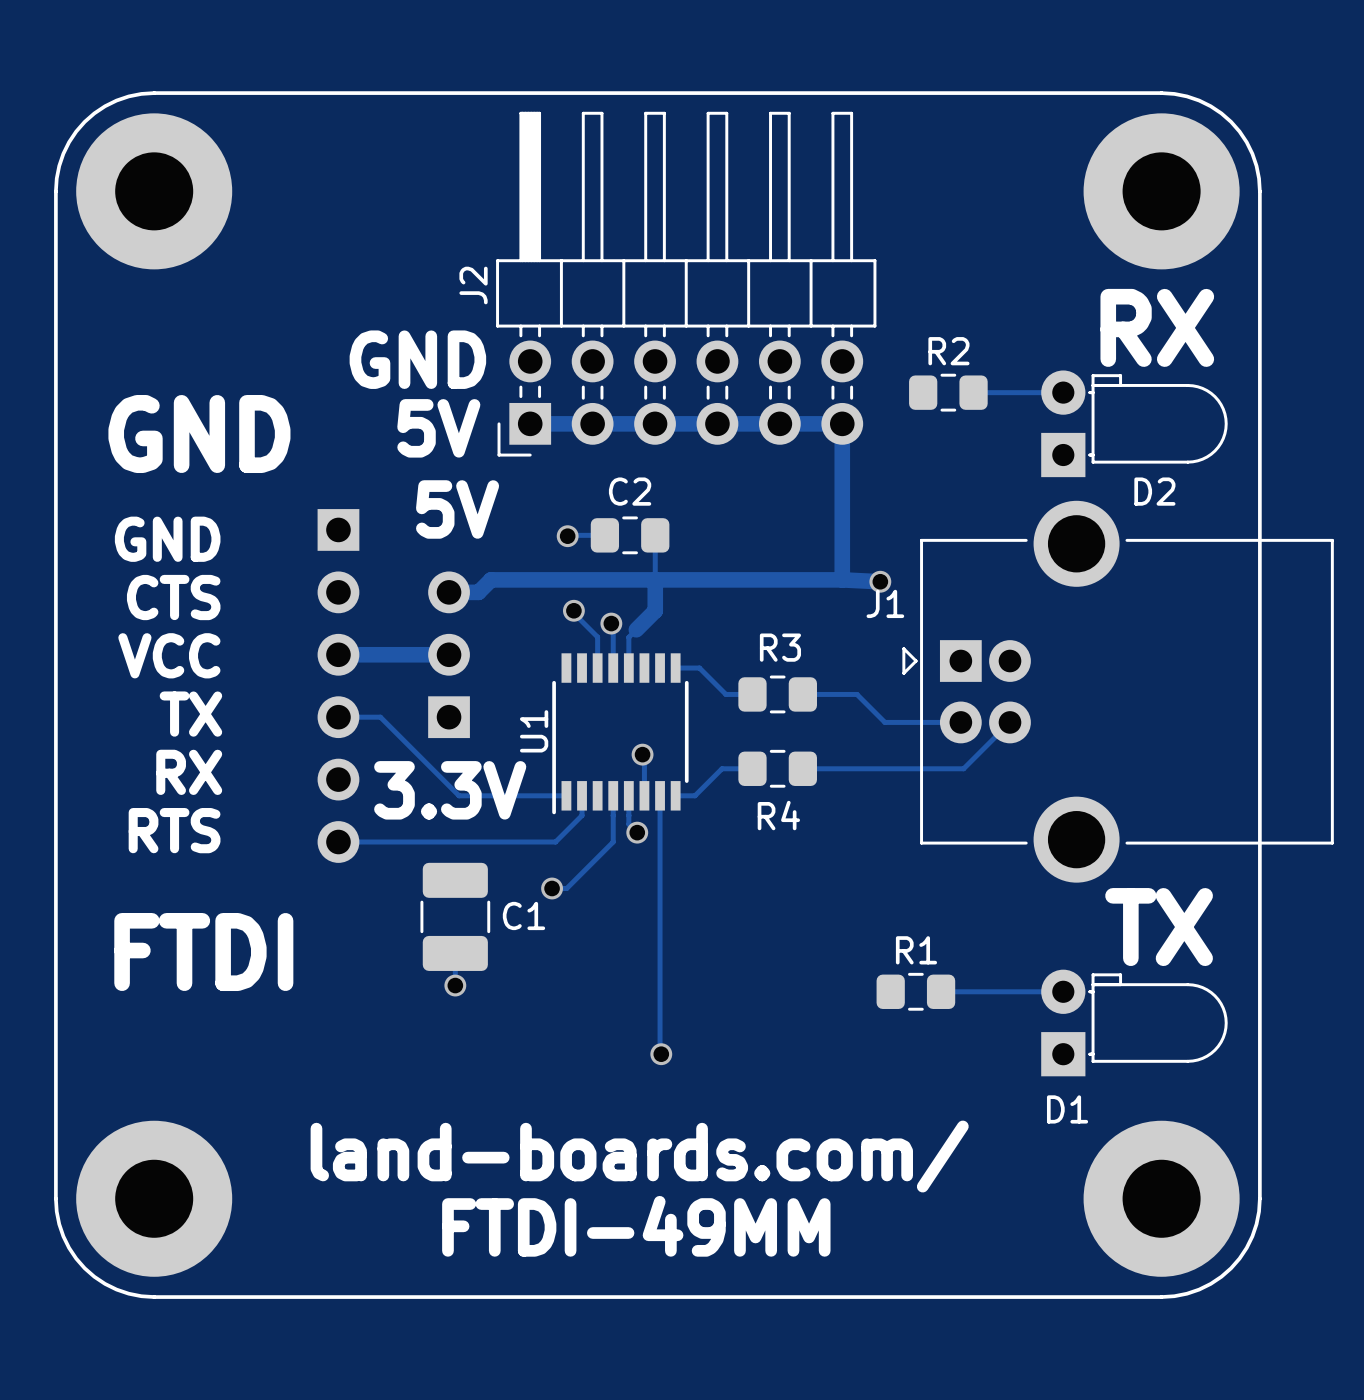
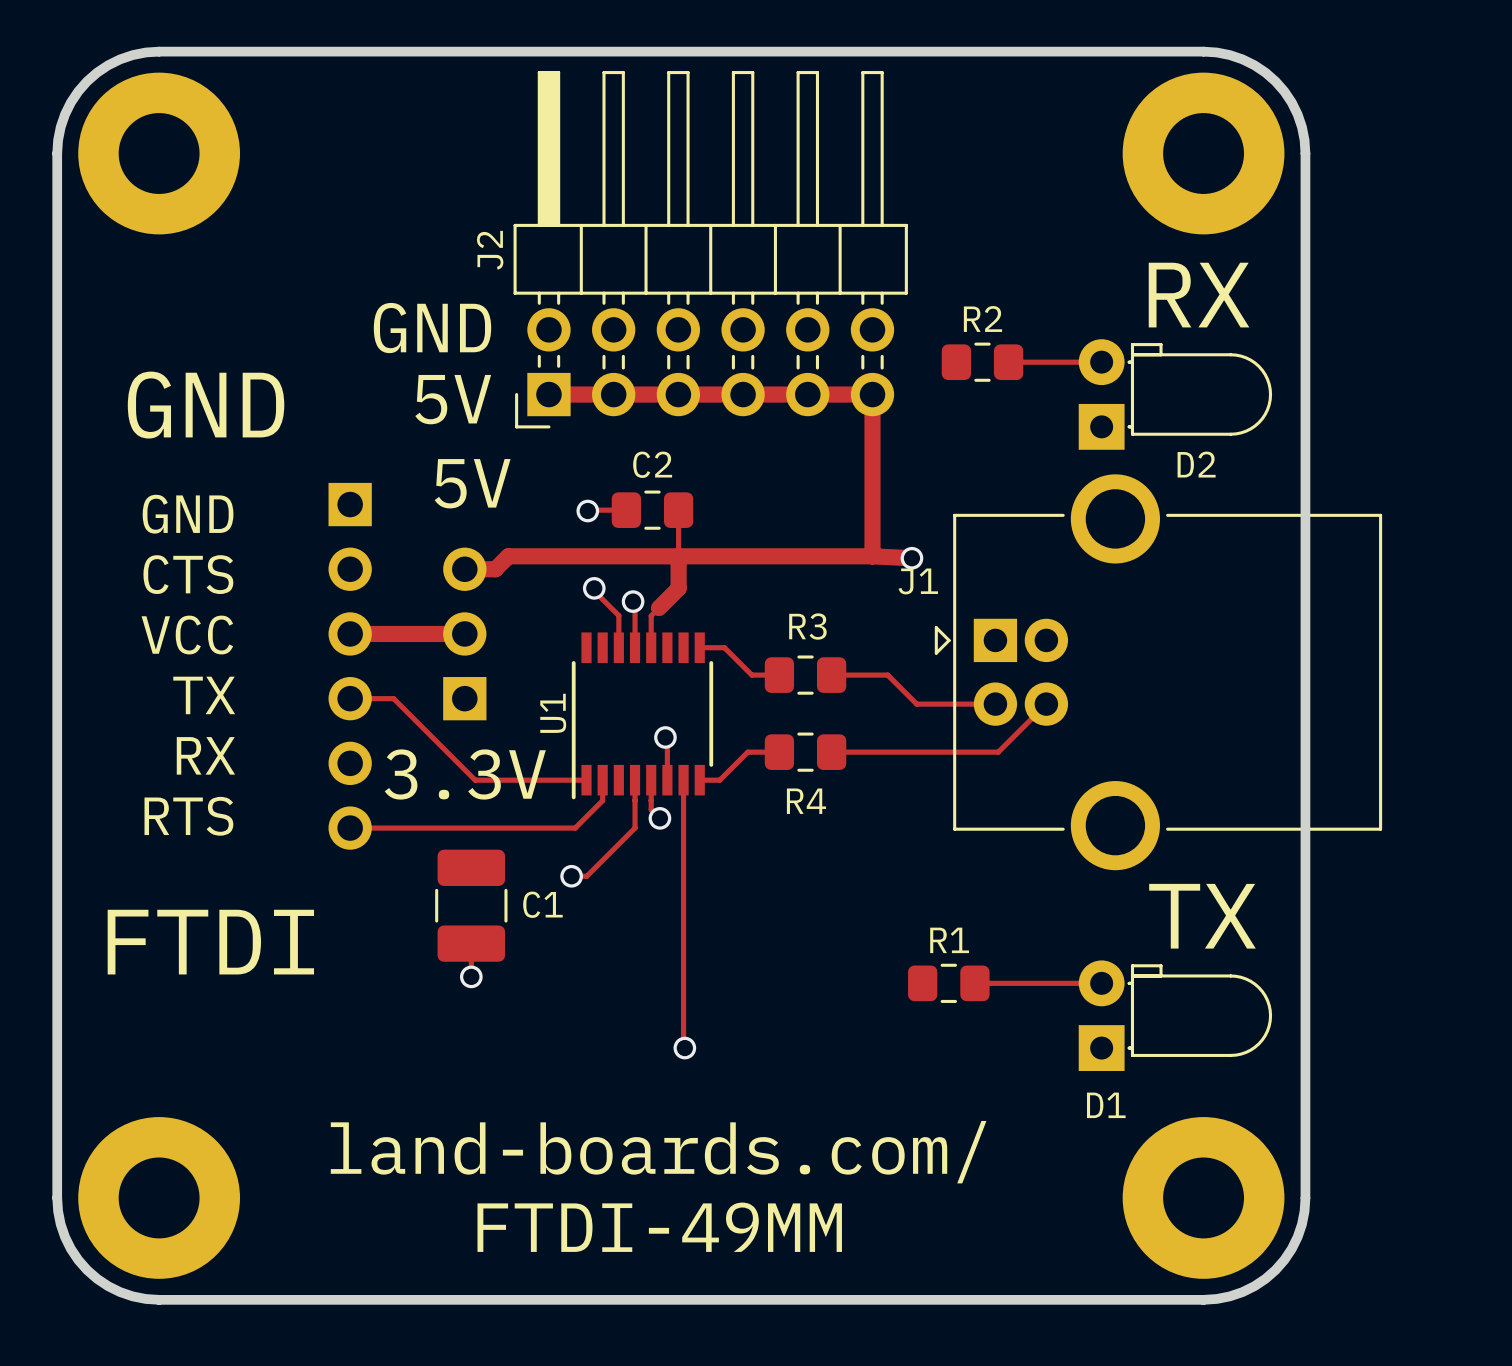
board edge: none -> (159, 51) (1203, 51) (1216, 52) (1242, 59) (1265, 72) (1275, 81) (1291, 102) (1297, 114) (1304, 140) (1305, 153) (1305, 1197) (1304, 1211) (1297, 1236) (1291, 1248) (1275, 1270) (1254, 1286) (1242, 1292) (1216, 1298) (1203, 1299) (159, 1299) (145, 1298) (120, 1292) (108, 1286) (87, 1270) (78, 1259) (64, 1236) (58, 1211) (57, 1197) (57, 153) (60, 127) (64, 114) (78, 91) (87, 81) (108, 65) (120, 59) (132, 55) (159, 51)

